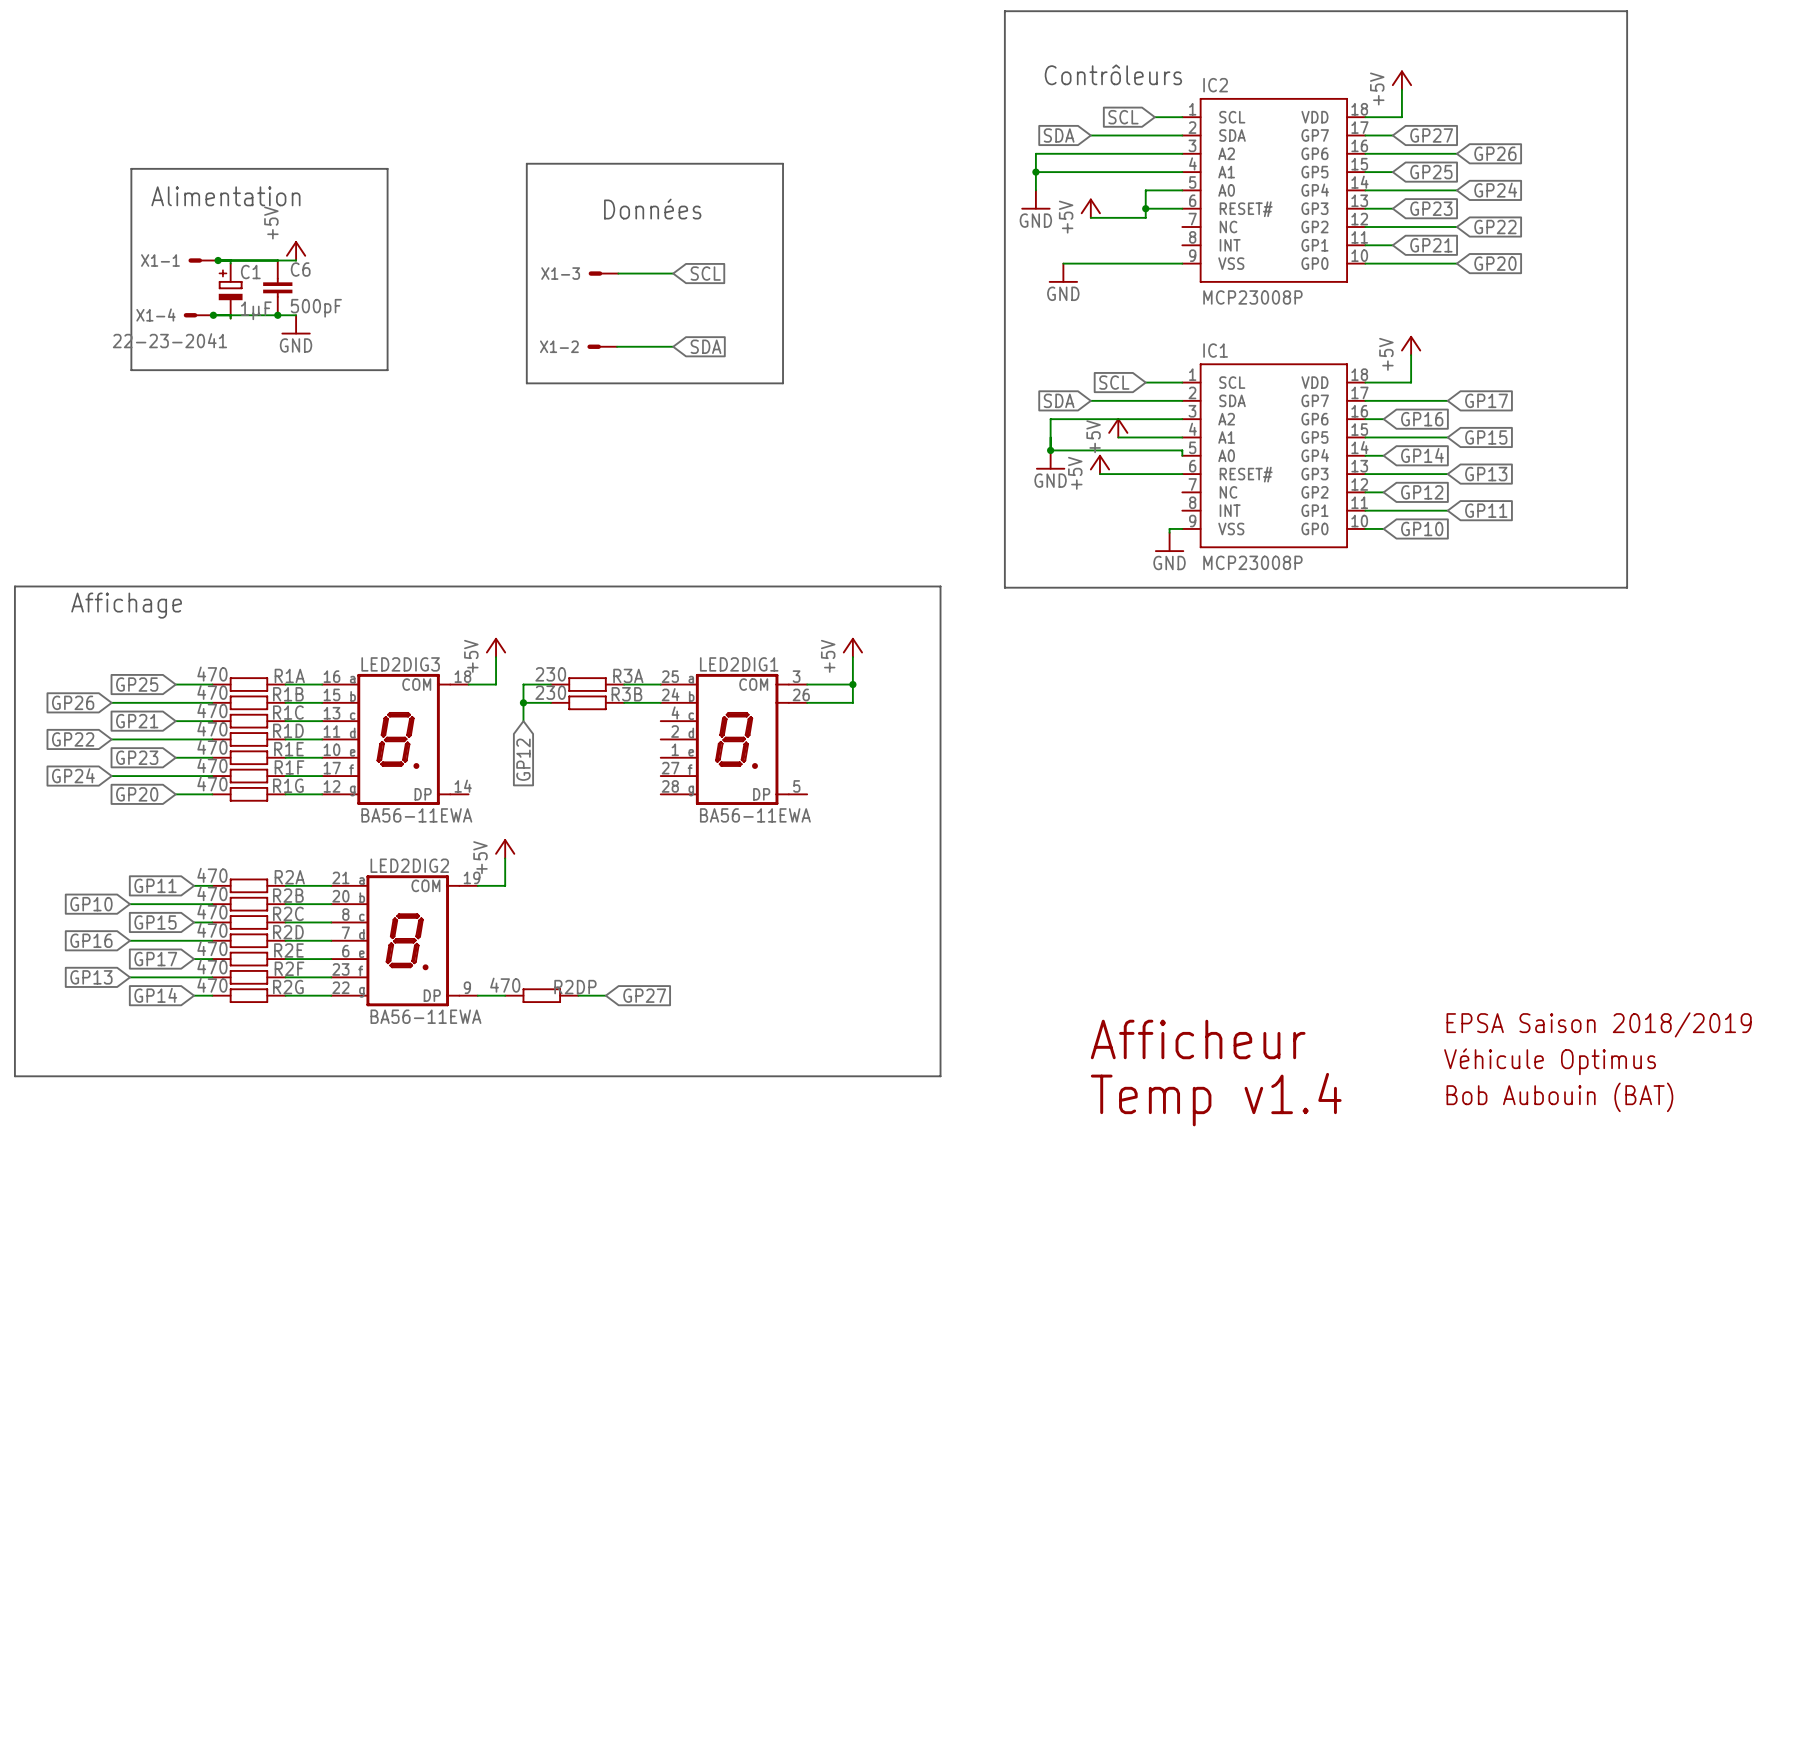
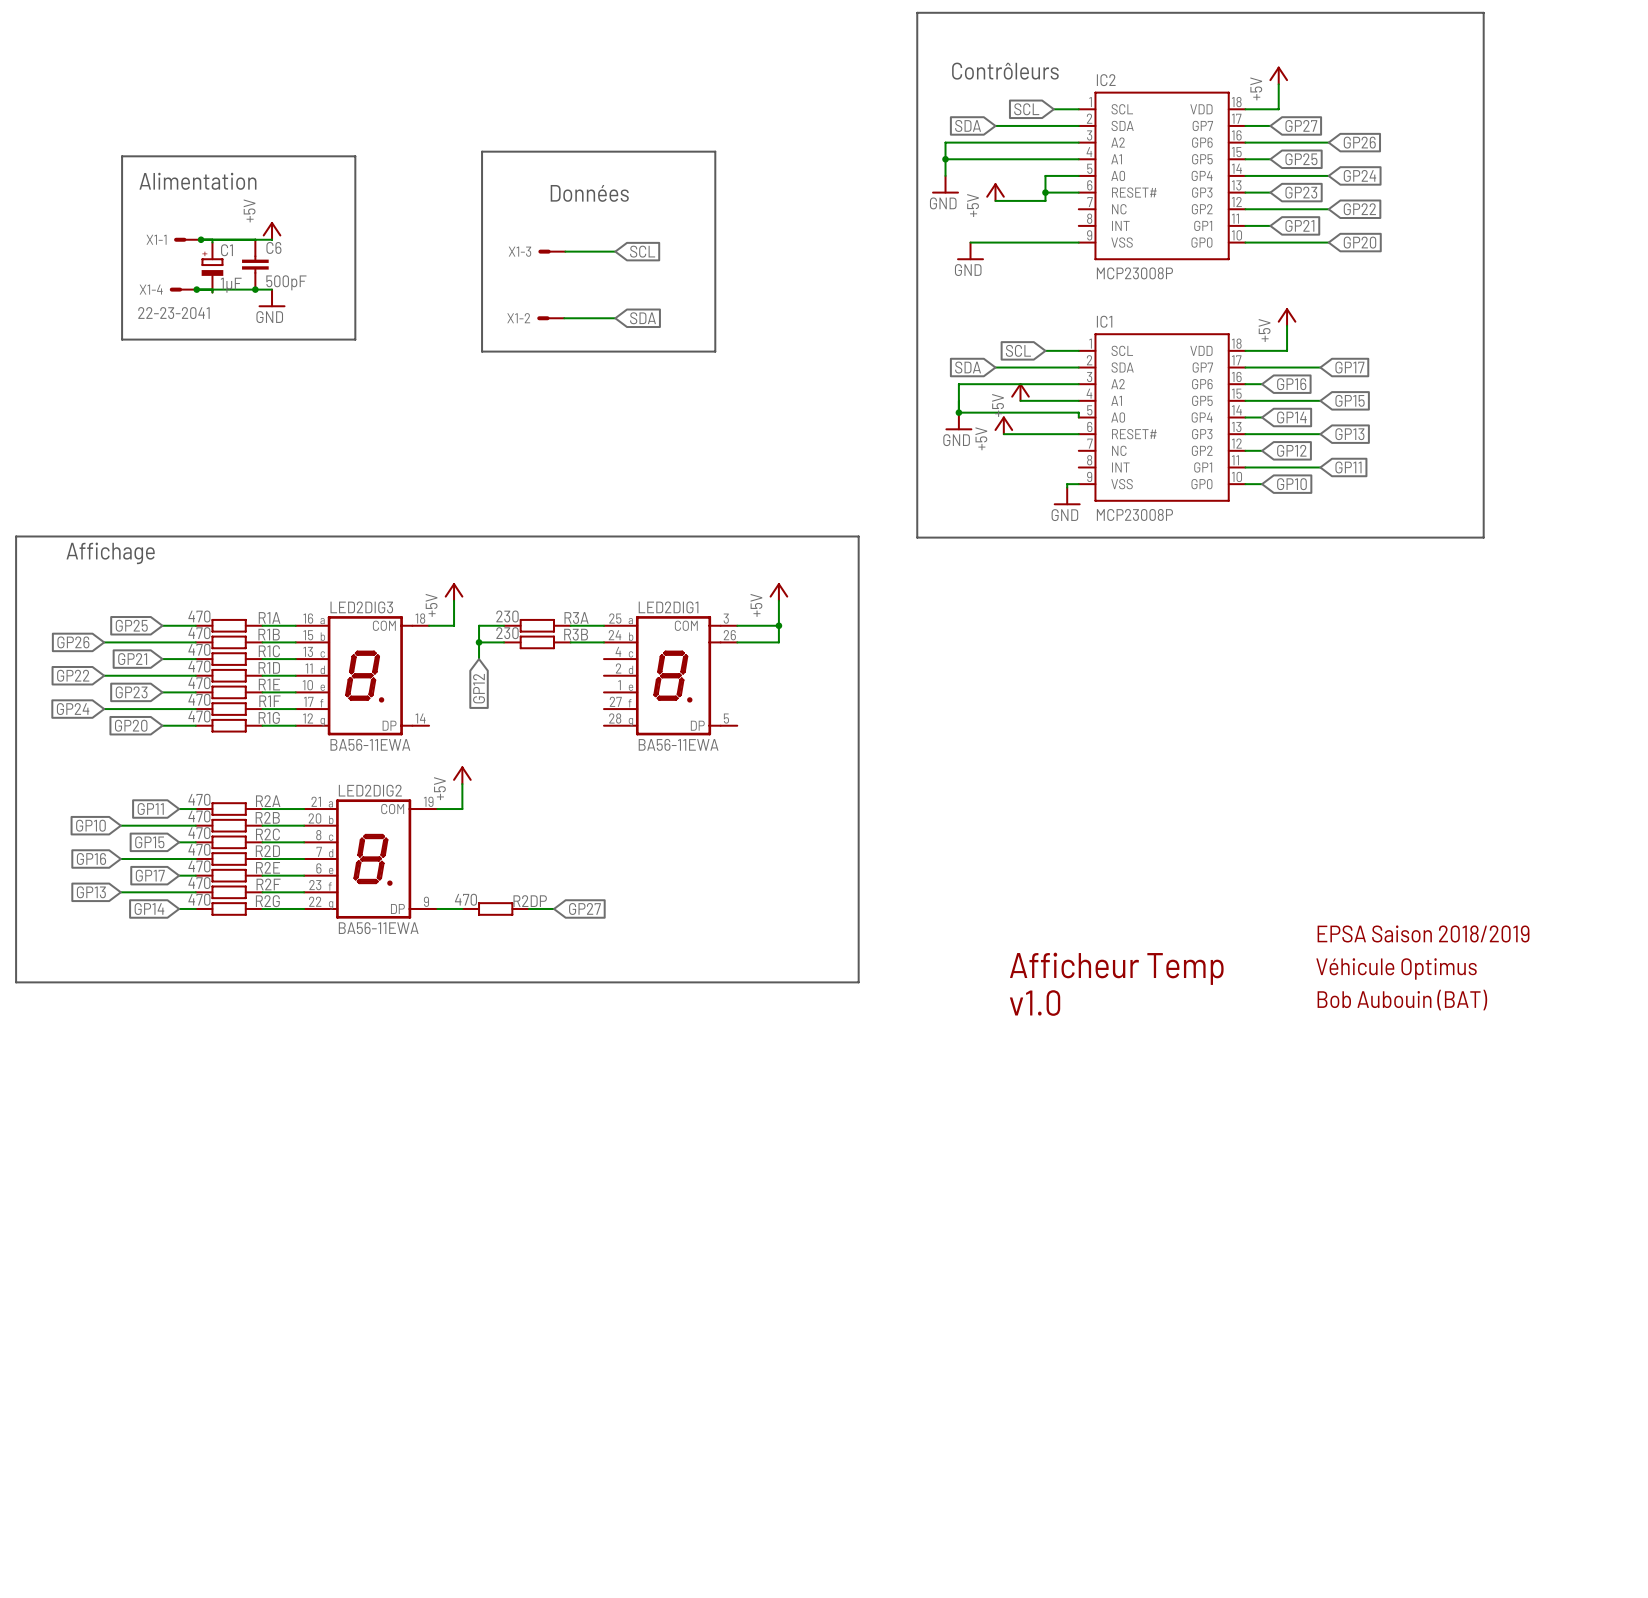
text: Afficheur (1198, 1039) -> Afficheur Temp (1116, 968)
text: none -> v1.0 (1035, 1003)
text: Temp v1.4 (1216, 1099) -> none

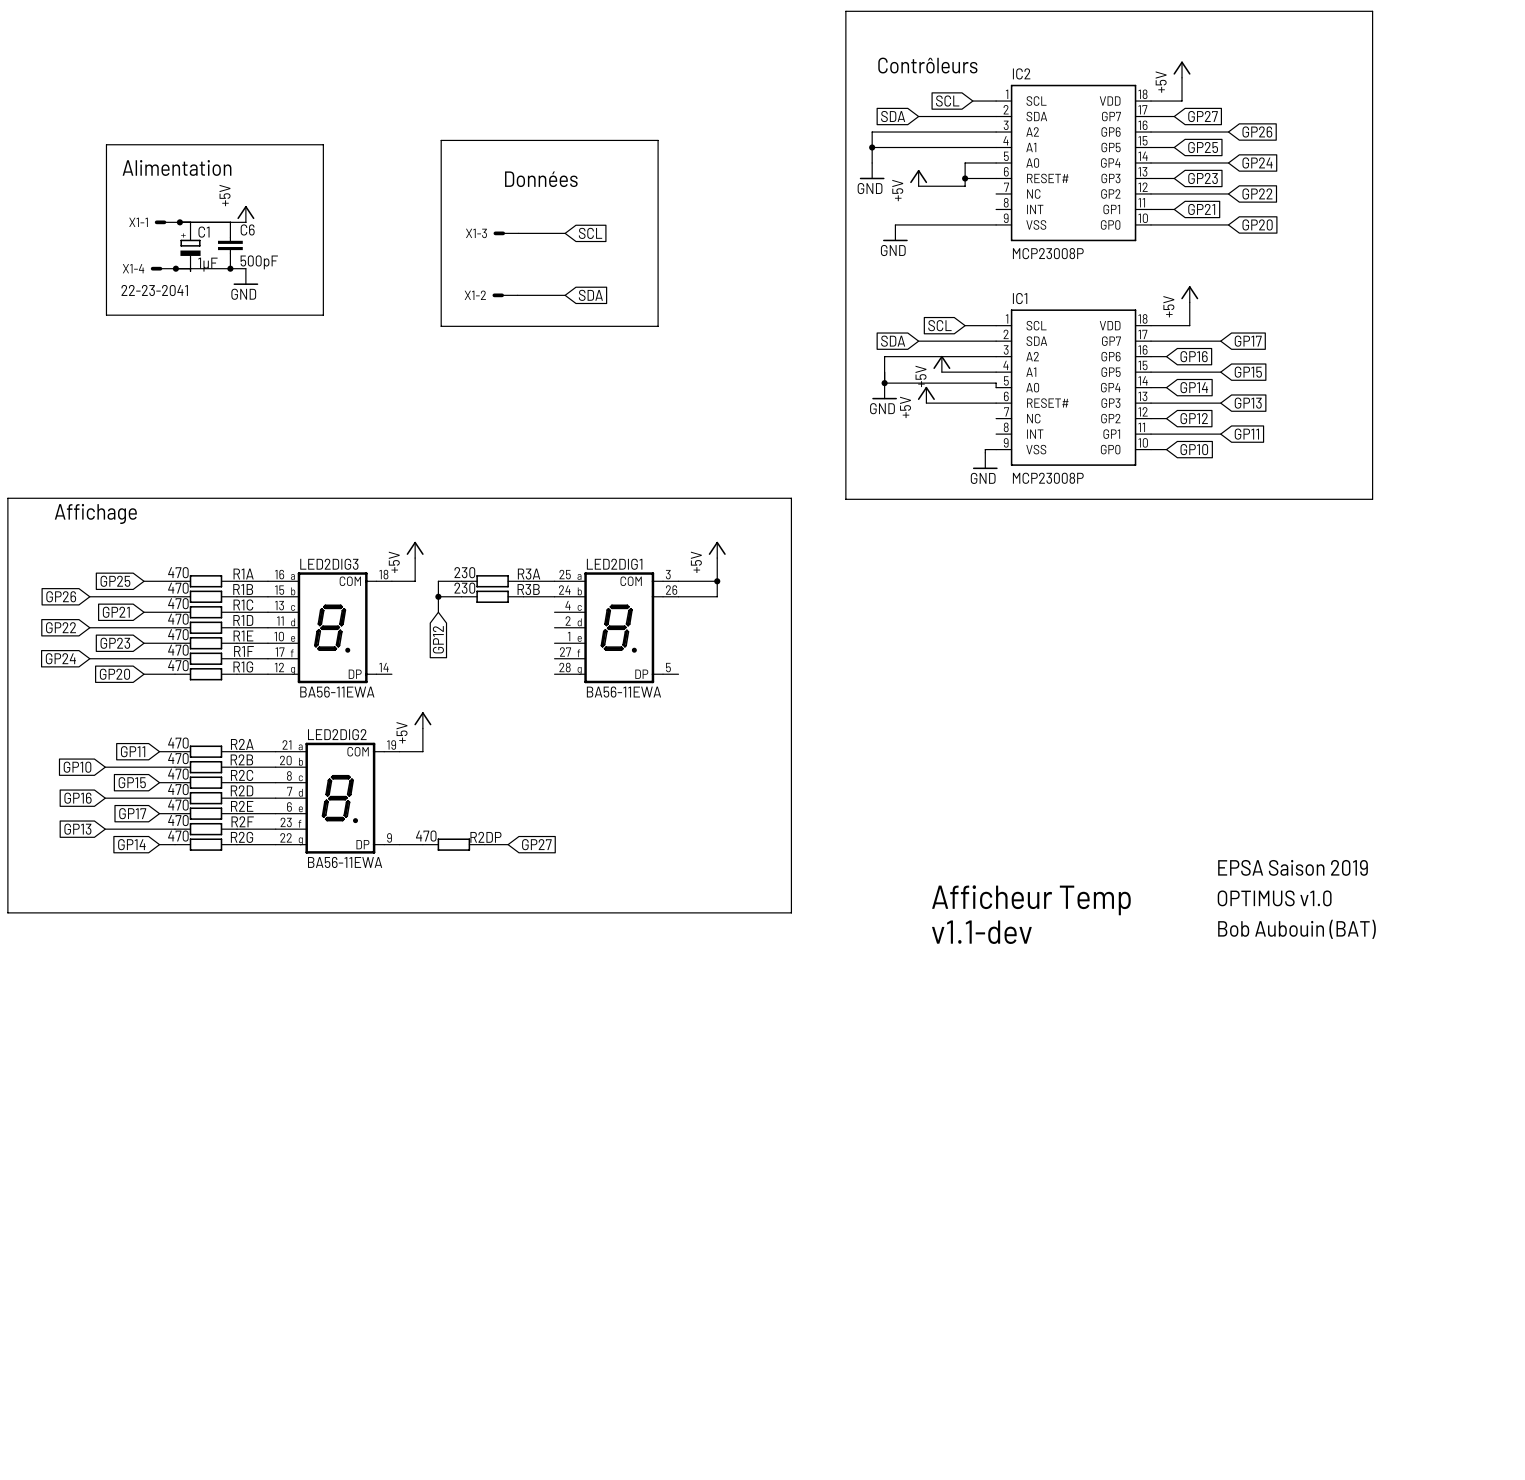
text: EPSA Saison 2018/2019 (1423, 933) -> EPSA Saison 2019 (1293, 867)
text: Véhicule Optimus (1396, 968) -> OPTIMUS v1.0 (1274, 898)
text: v1.0 (1035, 1003) -> v1.1-dev (981, 932)

